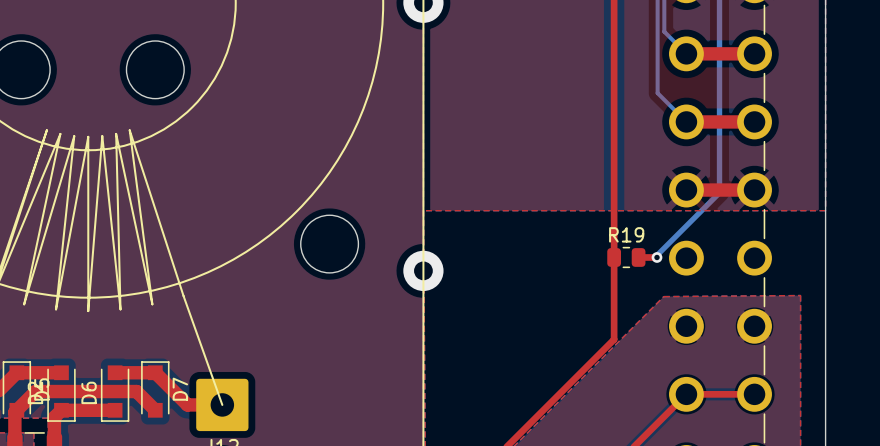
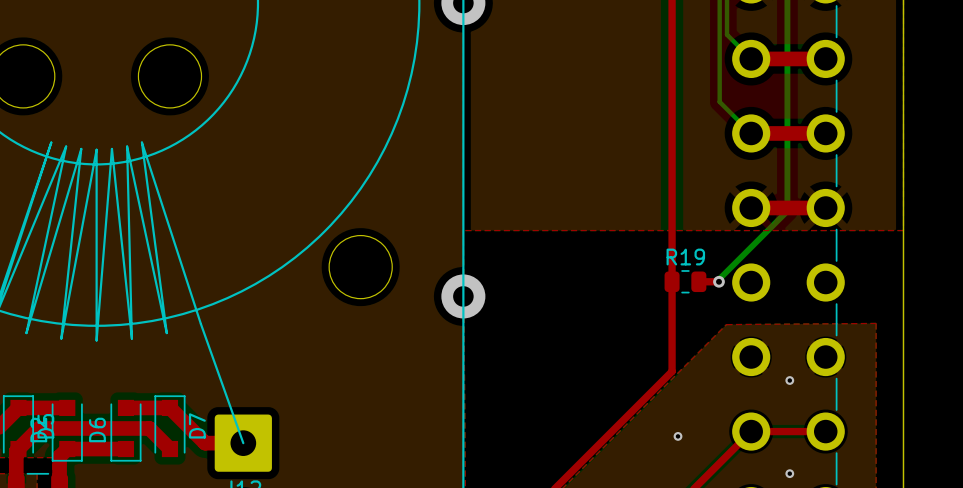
via: none -> (789, 380)
via: none -> (678, 436)
via: none -> (789, 473)

